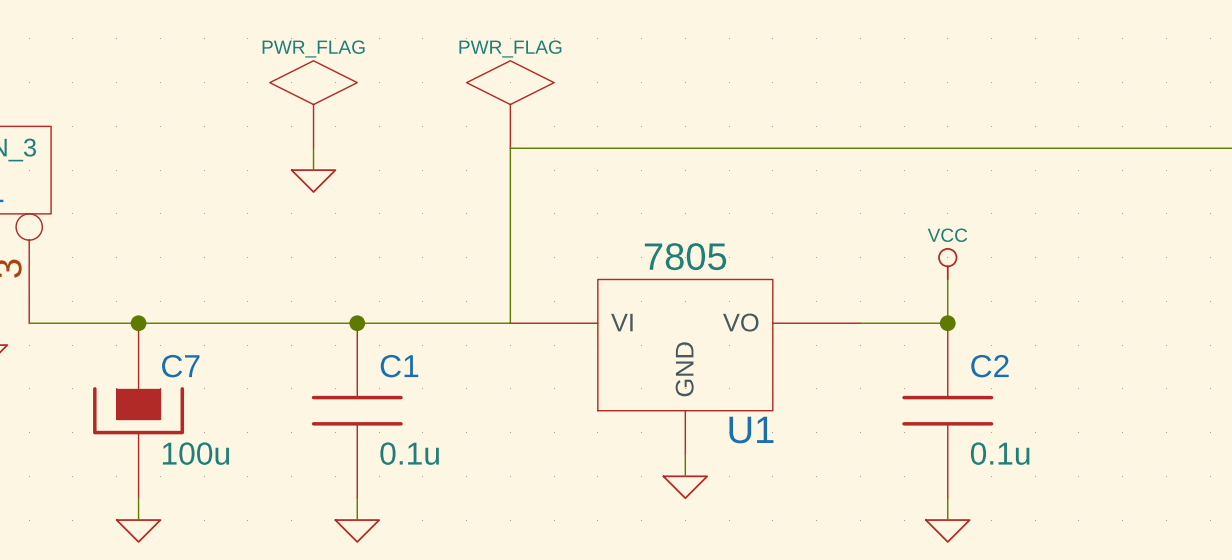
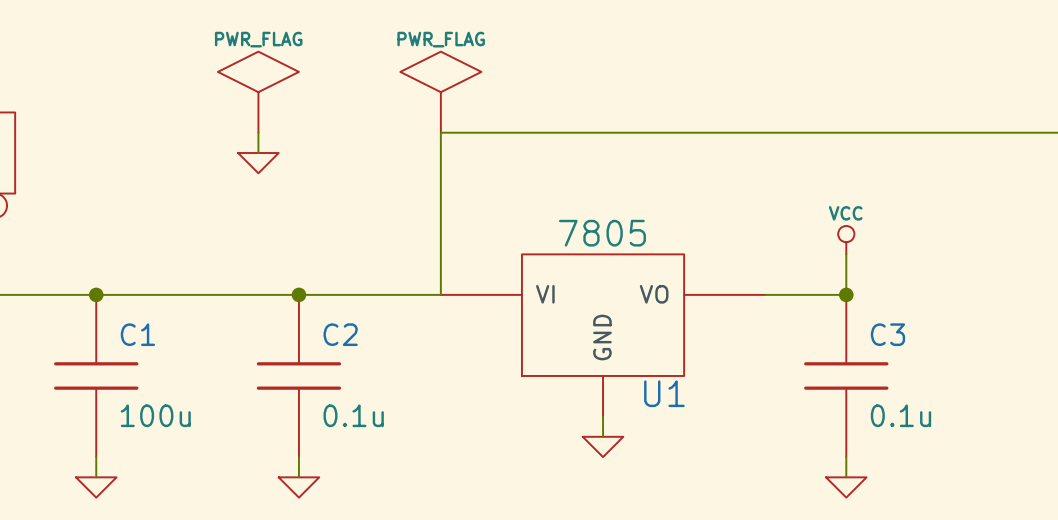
C1 name: C1 (399, 366) -> C2 (340, 334)
C2 name: C2 (989, 366) -> C3 (887, 334)
C7: 100u (138, 410) -> none
C1: none -> 100u (96, 375)

